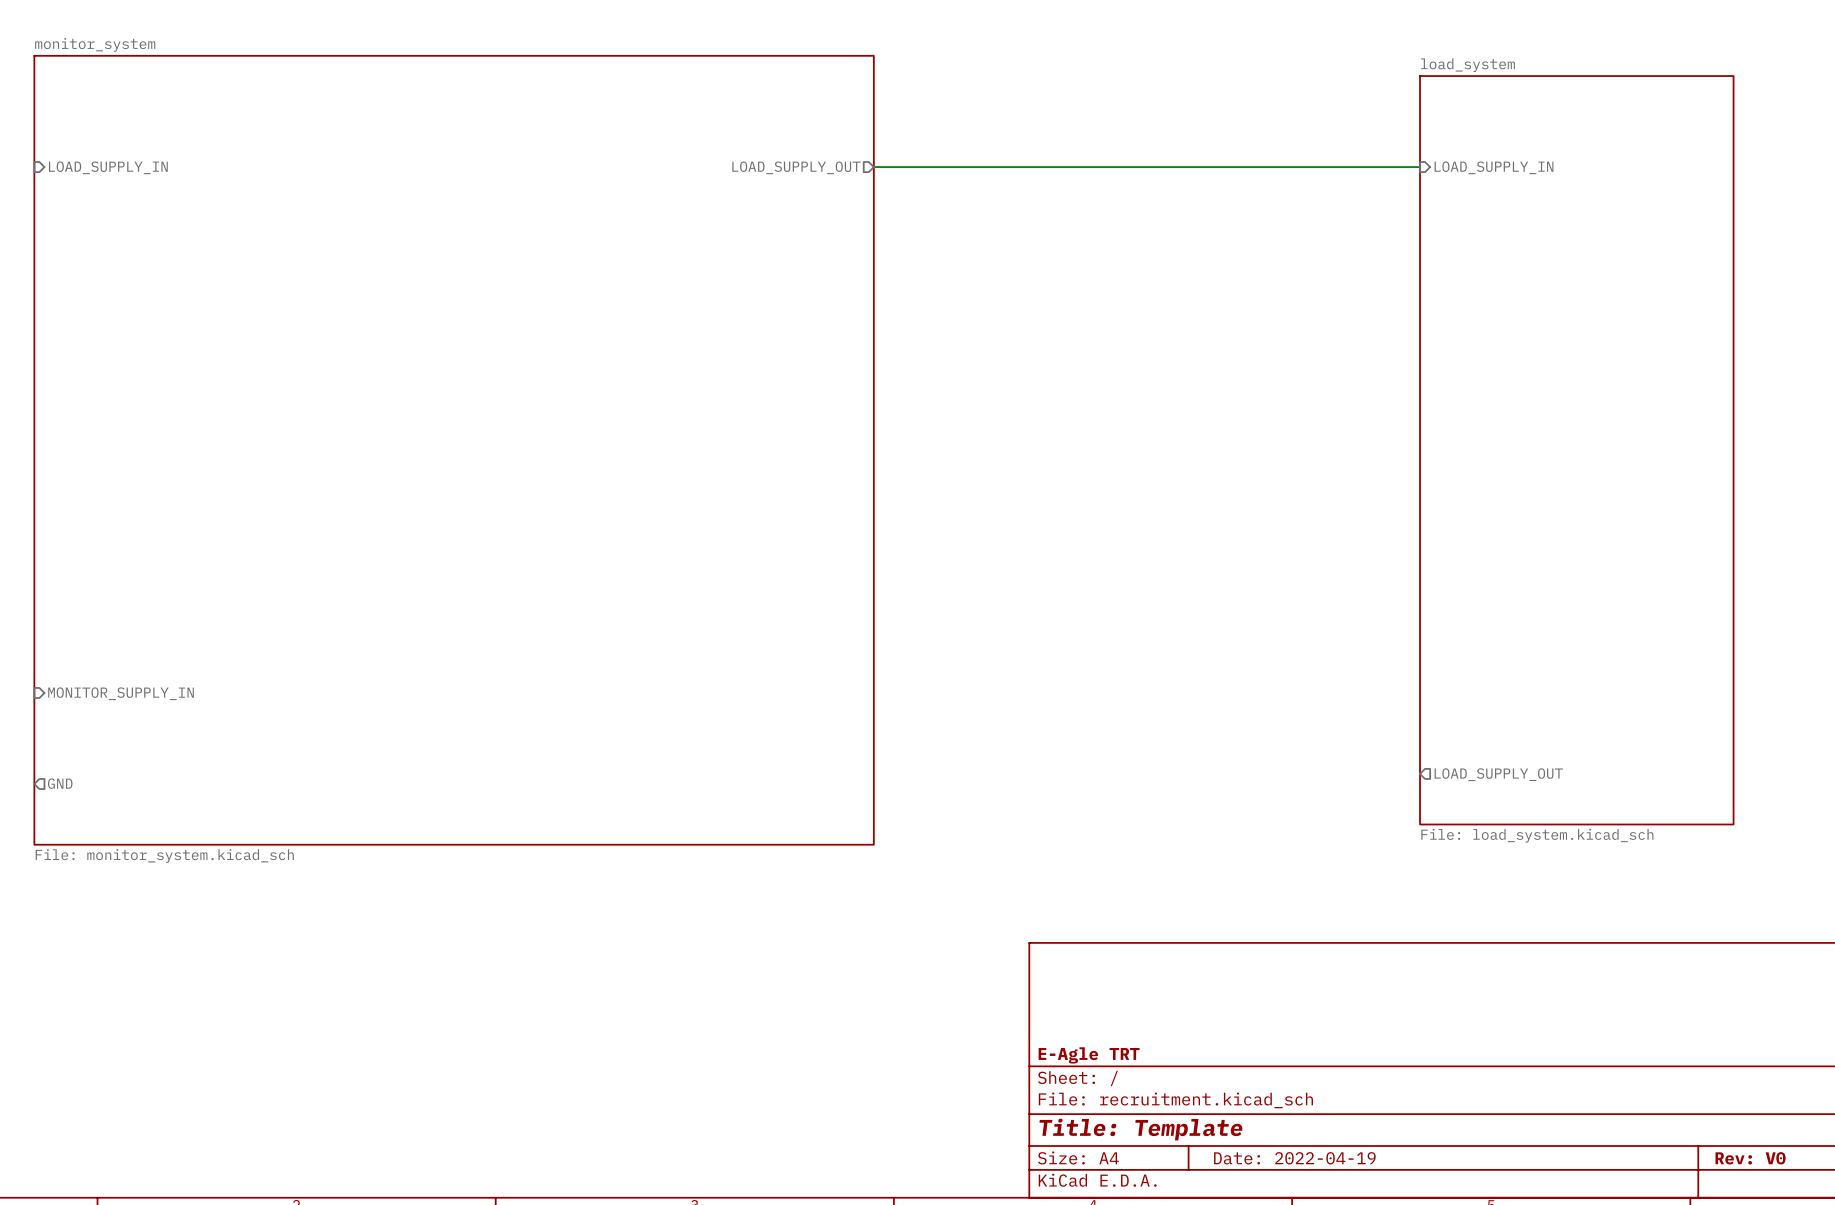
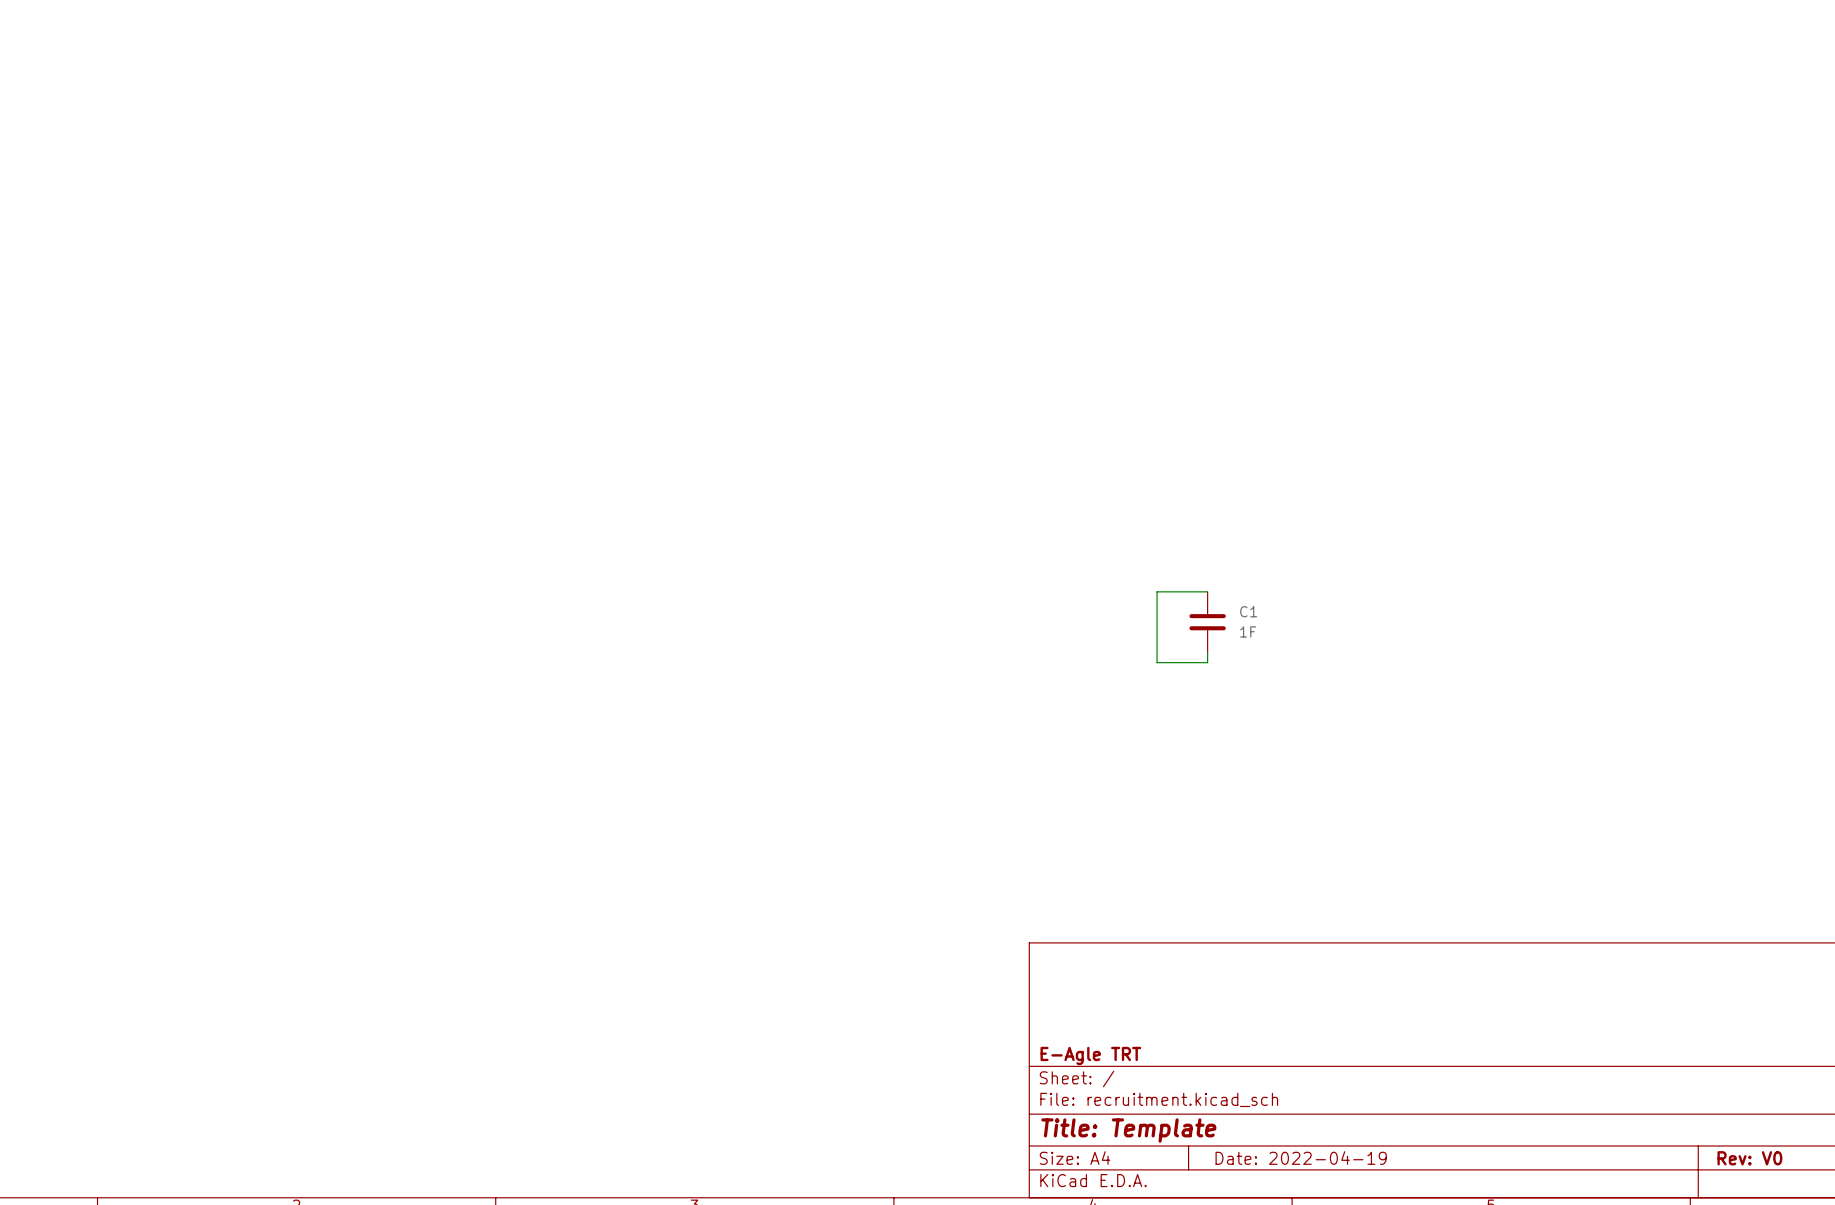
sheet pin: LOAD_SUPPLY_IN (108, 167) -> none
sheet pin: LOAD_SUPPLY_OUT (796, 167) -> none
wire: (873, 167) (1420, 167) -> none
sheet pin: LOAD_SUPPLY_IN (1494, 167) -> none
sheet monitor_system: File: monitor_system.kicad_sch (454, 450) -> none
sheet load_system: File: load_system.kicad_sch (1576, 450) -> none
wire: none -> (1207, 591) (1157, 591) (1157, 662) (1207, 662) (1207, 652)
C1: none -> 1F (1207, 622)
sheet pin: MONITOR_SUPPLY_IN (121, 693) -> none
sheet pin: LOAD_SUPPLY_OUT (1498, 774) -> none
sheet pin: GND (60, 783) -> none

